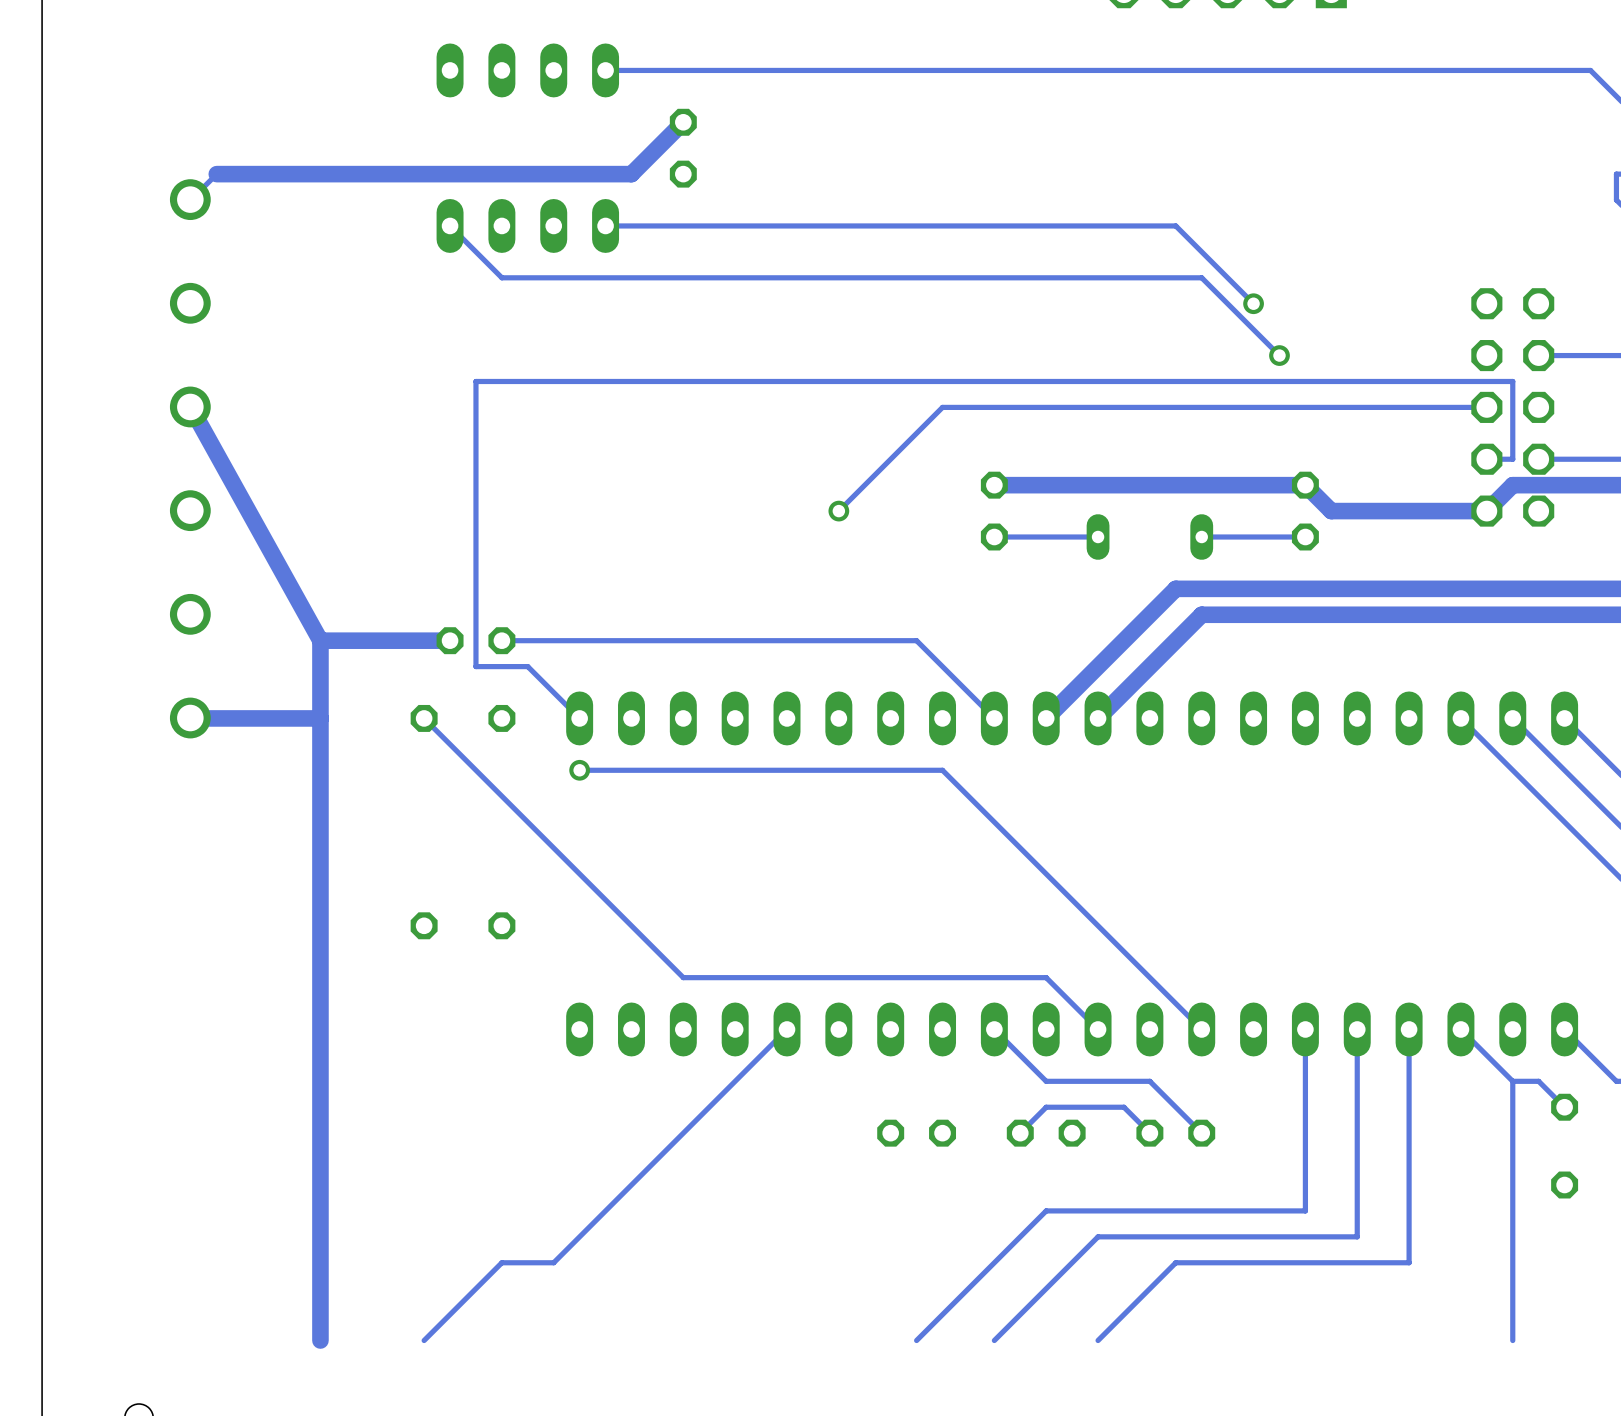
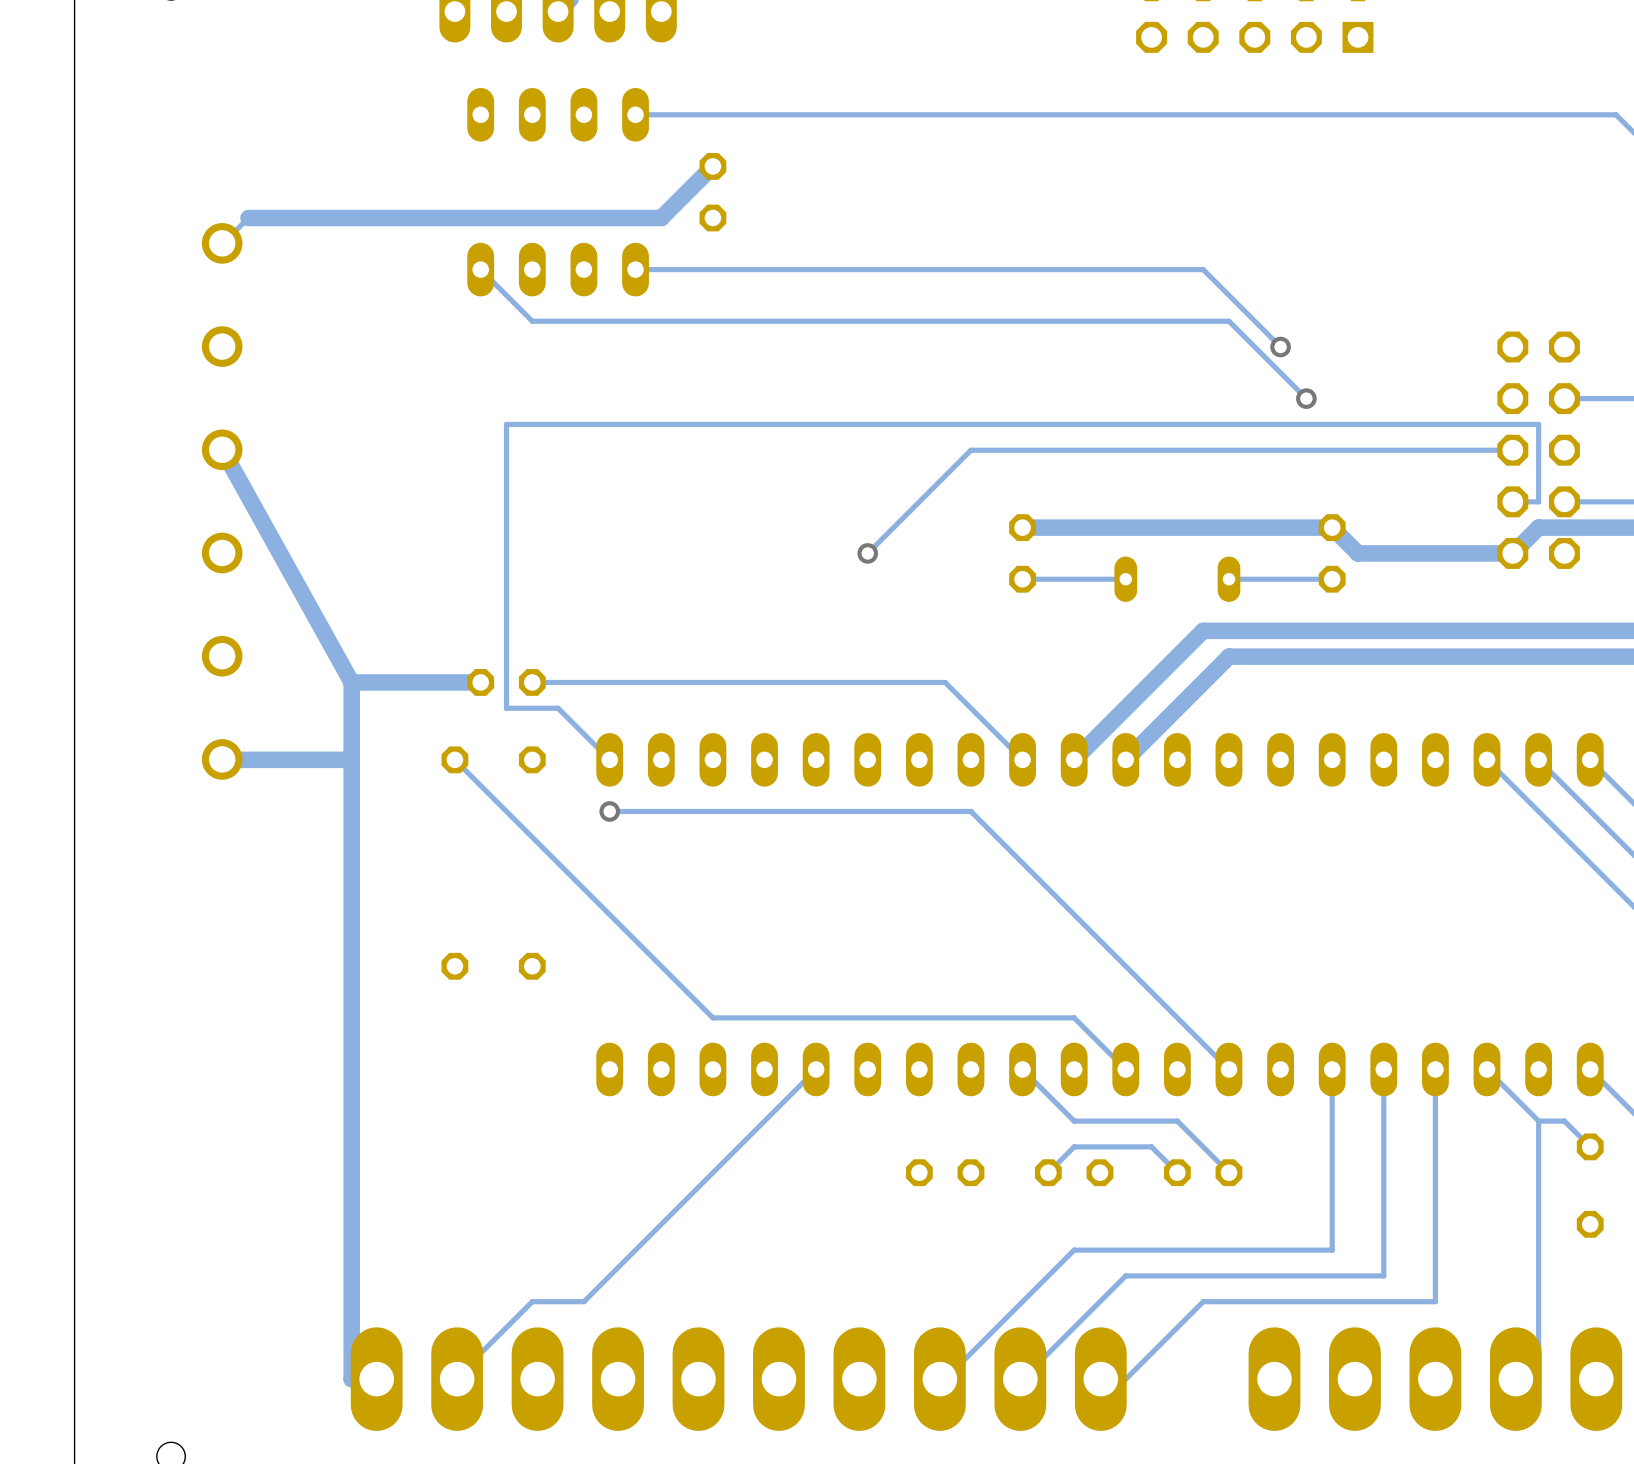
part: none -> (738, 1379)
part: none -> (1435, 1379)

